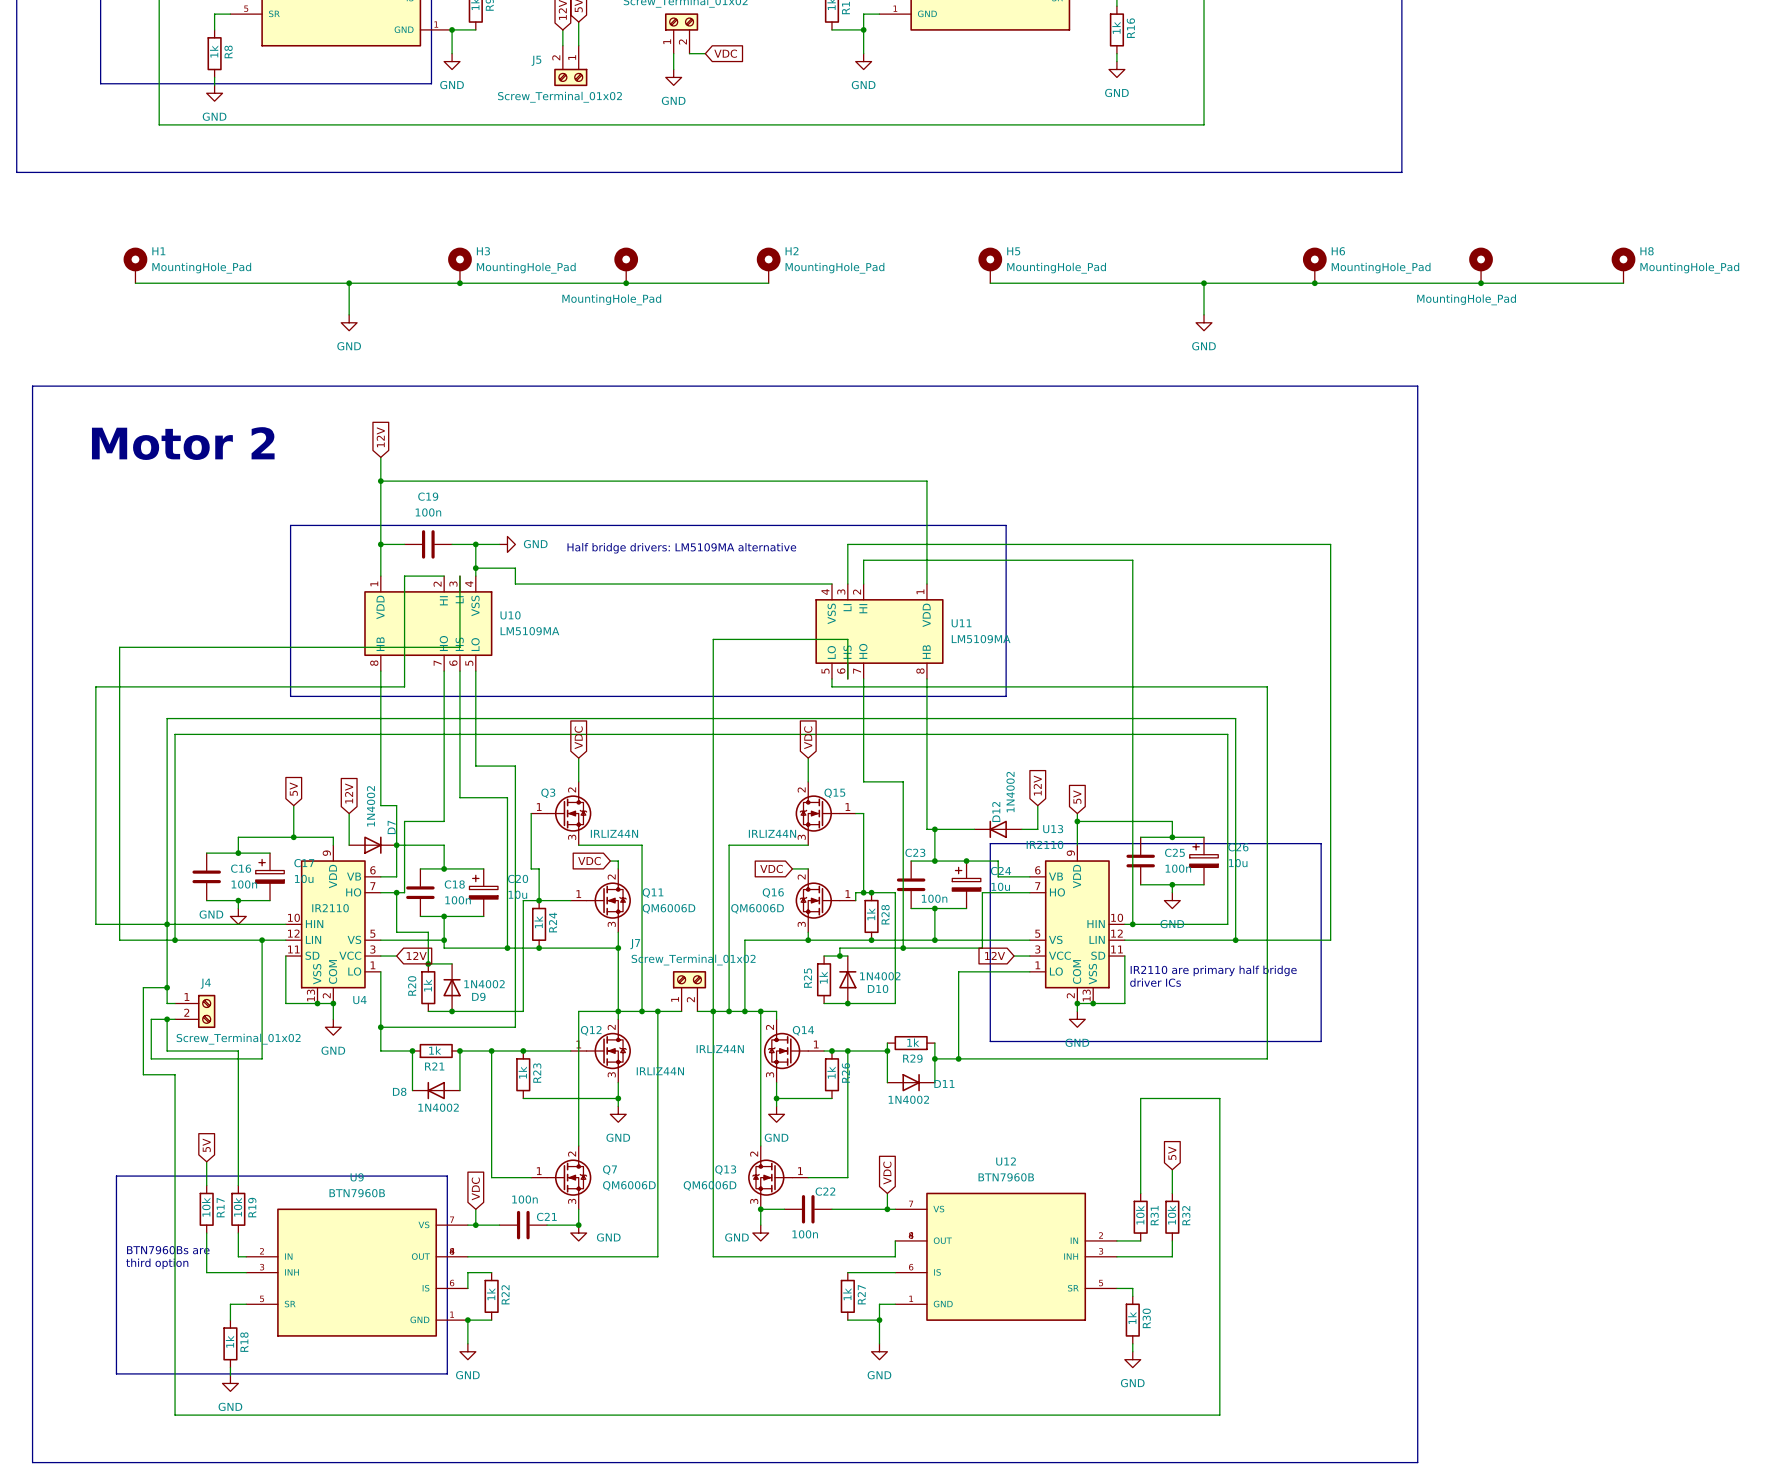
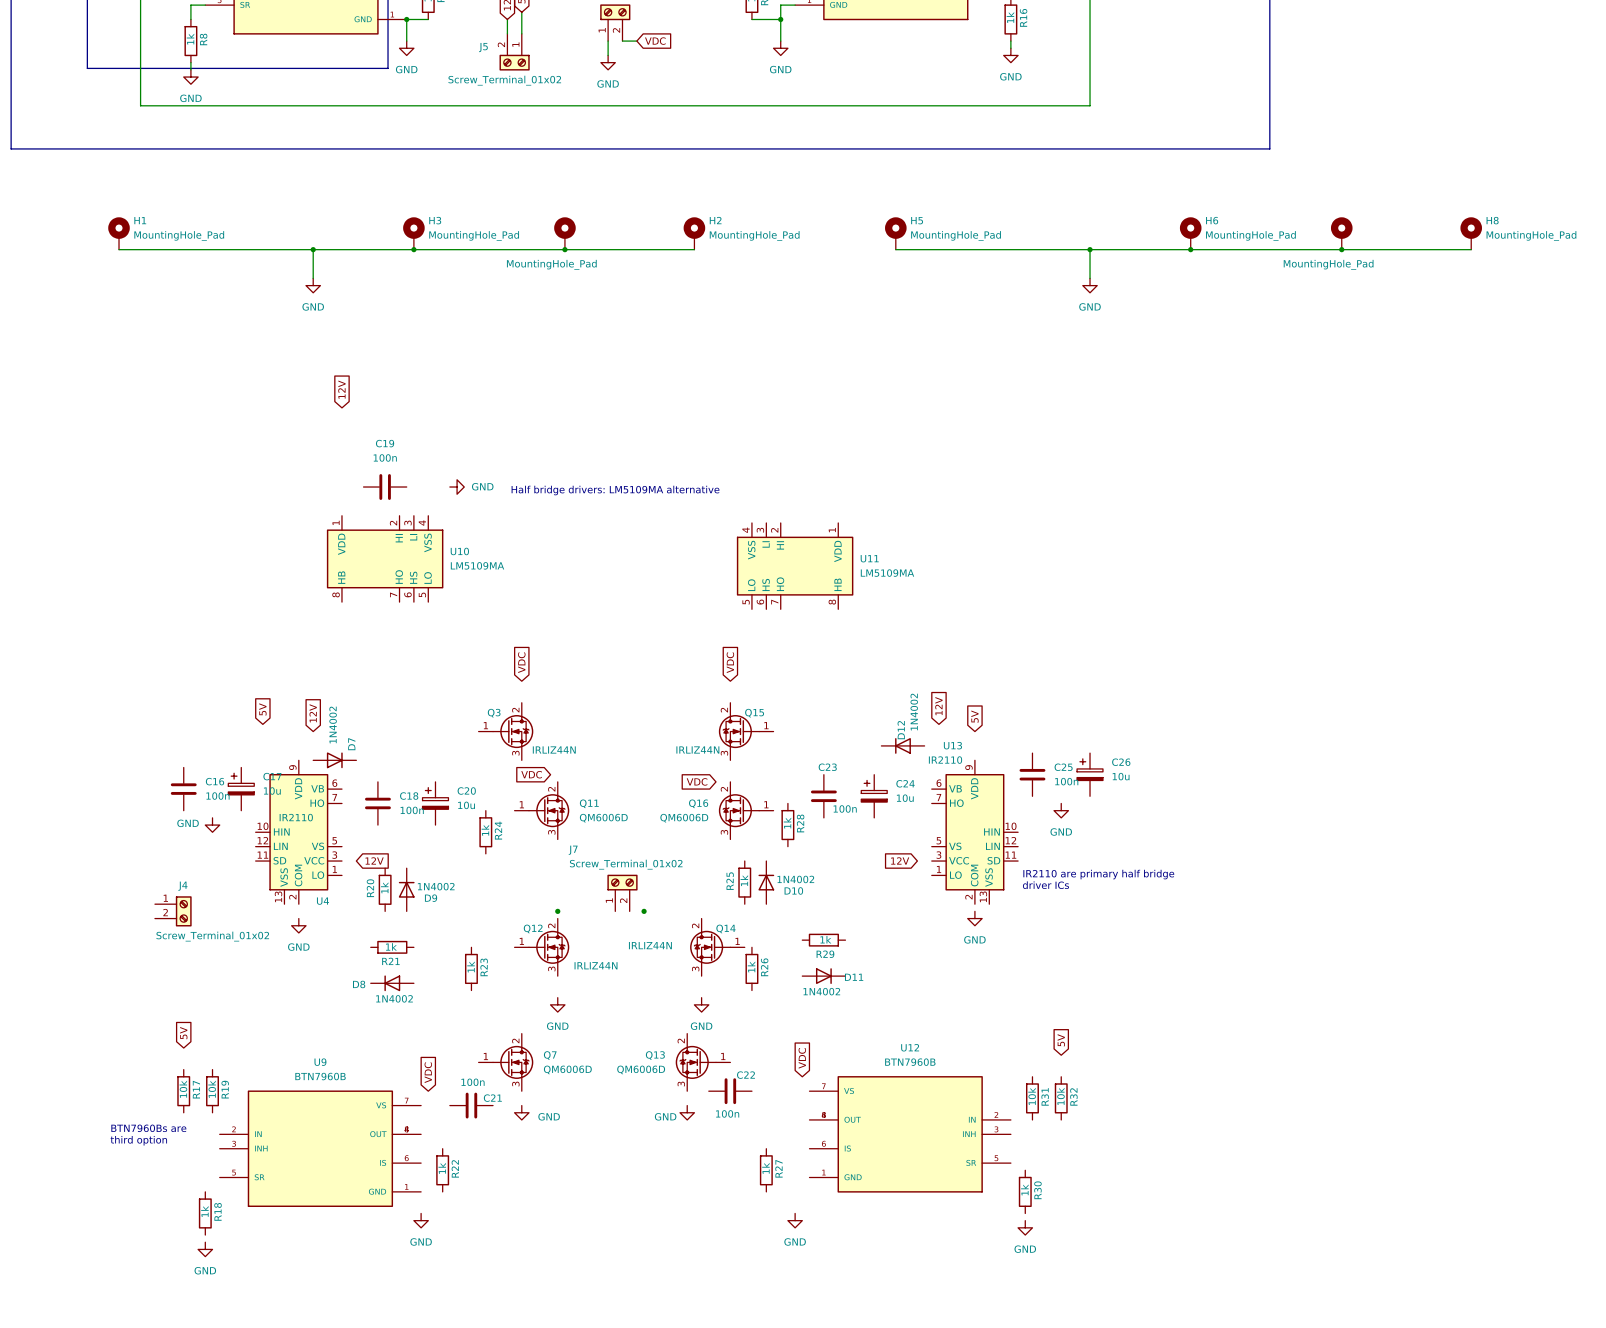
line: (32, 386) (1417, 386) (1417, 1462) (32, 1462) (32, 386) -> none
text: Motor 2 (183, 443) -> none
wire: (380, 457) (380, 576) -> none
wire: (380, 481) (926, 481) (926, 584) -> none
junction: (380, 481) -> none
line: (290, 525) (1006, 525) (1006, 696) (290, 696) (290, 525) -> none
wire: (380, 544) (404, 544) -> none
junction: (380, 544) -> none
wire: (452, 544) (499, 544) -> none
wire: (475, 544) (475, 576) -> none
junction: (475, 544) -> none
wire: (475, 568) (515, 568) (515, 584) (831, 584) -> none
junction: (475, 568) -> none
wire: (444, 576) (404, 576) (404, 686) (95, 686) (95, 924) (285, 924) -> none
wire: (459, 576) (459, 647) (119, 647) (119, 940) (285, 940) -> none
wire: (847, 584) (847, 544) (1330, 544) (1330, 940) (1124, 940) -> none
wire: (863, 584) (863, 560) (1132, 560) (1132, 924) -> none
wire: (380, 671) (380, 805) (396, 805) (396, 876) (380, 876) -> none
wire: (444, 671) (444, 821) (404, 821) (404, 892) (380, 892) -> none
wire: (459, 671) (459, 797) (507, 797) (507, 948) -> none
wire: (475, 671) (475, 766) (515, 766) (515, 1027) (380, 1027) -> none
wire: (831, 678) (831, 686) (1267, 686) (1267, 1058) (934, 1058) -> none
wire: (847, 678) (847, 639) (713, 639) (713, 1256) (895, 1256) (895, 1240) -> none
wire: (863, 678) (863, 781) (903, 781) (903, 948) -> none
wire: (926, 678) (926, 829) (974, 829) -> none
wire: (578, 758) (578, 781) -> none
wire: (808, 758) (808, 781) -> none
wire: (293, 805) (293, 837) -> none
wire: (1037, 805) (1037, 829) (1021, 829) -> none
wire: (349, 813) (349, 845) -> none
wire: (531, 813) (531, 868) (539, 868) (539, 900) -> none
wire: (855, 813) (863, 813) (863, 892) -> none
wire: (1077, 813) (1077, 845) -> none
wire: (1077, 821) (1172, 821) (1172, 837) -> none
junction: (1077, 821) -> none
wire: (934, 829) (934, 861) -> none
junction: (934, 829) -> none
junction: (293, 837) -> none
wire: (1140, 837) (1204, 837) -> none
junction: (1172, 837) -> none
line: (990, 843) (1321, 843) (1321, 1041) (990, 1041) (990, 843) -> none
wire: (333, 845) (333, 837) (238, 837) (238, 853) -> none
wire: (396, 845) (444, 845) (444, 868) -> none
junction: (396, 845) -> none
wire: (578, 845) (642, 845) (642, 1011) -> none
wire: (808, 845) (729, 845) (729, 1011) -> none
wire: (206, 853) (270, 853) -> none
junction: (238, 853) -> none
wire: (610, 861) (618, 861) (618, 868) -> none
wire: (911, 861) (998, 861) (998, 876) (1029, 876) -> none
junction: (934, 861) -> none
junction: (966, 861) -> none
wire: (420, 868) (483, 868) -> none
junction: (444, 868) -> none
wire: (792, 868) (808, 868) -> none
wire: (1140, 884) (1204, 884) -> none
wire: (1172, 884) (1172, 892) -> none
junction: (1172, 884) -> none
wire: (396, 892) (396, 932) (428, 932) (428, 963) (452, 963) -> none
junction: (396, 892) -> none
junction: (863, 892) -> none
junction: (871, 892) -> none
wire: (1029, 892) (982, 892) (982, 948) (839, 948) (839, 956) -> none
wire: (206, 900) (270, 900) -> none
wire: (238, 900) (238, 908) -> none
junction: (238, 900) -> none
junction: (539, 900) -> none
wire: (570, 900) (523, 900) (523, 1011) (428, 1011) -> none
wire: (855, 900) (855, 892) (895, 892) (895, 1003) (824, 1003) -> none
wire: (911, 908) (966, 908) -> none
wire: (934, 908) (934, 940) -> none
junction: (934, 908) -> none
wire: (420, 916) (483, 916) -> none
wire: (444, 916) (444, 948) (618, 948) -> none
junction: (444, 916) -> none
junction: (167, 924) -> none
wire: (1124, 924) (1227, 924) (1227, 734) (175, 734) (175, 940) -> none
junction: (1132, 924) -> none
wire: (618, 932) (618, 1019) -> none
wire: (808, 932) (808, 940) -> none
junction: (175, 940) -> none
wire: (262, 940) (262, 1058) (151, 1058) (151, 1019) (175, 1019) -> none
junction: (262, 940) -> none
wire: (380, 940) (444, 940) -> none
junction: (444, 940) -> none
junction: (808, 940) -> none
junction: (871, 940) -> none
junction: (934, 940) -> none
wire: (1029, 940) (744, 940) (744, 1011) -> none
wire: (1235, 940) (1235, 718) (167, 718) (167, 1003) (175, 1003) -> none
junction: (1235, 940) -> none
junction: (507, 948) -> none
junction: (539, 948) -> none
junction: (618, 948) -> none
junction: (903, 948) -> none
wire: (285, 956) (285, 1003) (333, 1003) (333, 1019) -> none
wire: (380, 956) (396, 956) -> none
wire: (824, 956) (847, 956) -> none
junction: (839, 956) -> none
wire: (1014, 956) (1029, 956) -> none
wire: (1124, 956) (1124, 1003) (1077, 1003) (1077, 1011) -> none
junction: (428, 963) -> none
wire: (380, 971) (380, 1051) (412, 1051) (412, 1090) -> none
wire: (1029, 971) (958, 971) (958, 1058) -> none
wire: (167, 987) (143, 987) (143, 1074) (175, 1074) (175, 1415) (1219, 1415) (1219, 1098) (1140, 1098) (1140, 1193) -> none
junction: (167, 987) -> none
junction: (317, 1003) -> none
junction: (333, 1003) -> none
junction: (847, 1003) -> none
junction: (1077, 1003) -> none
junction: (1093, 1003) -> none
junction: (452, 1011) -> none
junction: (642, 1011) -> none
wire: (657, 1011) (657, 1256) (467, 1256) -> none
junction: (657, 1011) -> none
wire: (681, 1011) (578, 1011) (578, 1145) -> none
wire: (697, 1011) (776, 1011) (776, 1019) -> none
junction: (729, 1011) -> none
junction: (744, 1011) -> none
wire: (760, 1011) (760, 1145) -> none
junction: (760, 1011) -> none
wire: (167, 1019) (167, 1051) (238, 1051) (238, 1185) -> none
junction: (167, 1019) -> none
junction: (380, 1027) -> none
wire: (887, 1043) (887, 1082) -> none
wire: (934, 1043) (934, 1082) -> none
junction: (412, 1051) -> none
junction: (459, 1051) -> none
wire: (491, 1051) (491, 1177) (531, 1177) -> none
junction: (491, 1051) -> none
junction: (523, 1051) -> none
wire: (570, 1051) (459, 1051) (459, 1090) -> none
wire: (824, 1051) (887, 1051) -> none
junction: (831, 1051) -> none
wire: (847, 1051) (847, 1177) (808, 1177) -> none
junction: (847, 1051) -> none
junction: (887, 1051) -> none
junction: (934, 1058) -> none
junction: (958, 1058) -> none
wire: (618, 1082) (618, 1106) -> none
wire: (776, 1082) (776, 1106) -> none
wire: (523, 1098) (618, 1098) -> none
junction: (618, 1098) -> none
wire: (776, 1098) (831, 1098) -> none
junction: (776, 1098) -> none
wire: (206, 1161) (206, 1185) -> none
wire: (1172, 1169) (1172, 1193) -> none
line: (116, 1176) (447, 1176) (447, 1373) (116, 1373) (116, 1176) -> none
wire: (887, 1193) (887, 1209) -> none
wire: (475, 1209) (475, 1225) -> none
wire: (578, 1209) (578, 1225) (547, 1225) -> none
junction: (760, 1209) -> none
wire: (784, 1209) (760, 1209) (760, 1225) -> none
wire: (831, 1209) (895, 1209) -> none
junction: (887, 1209) -> none
wire: (467, 1225) (499, 1225) -> none
junction: (475, 1225) -> none
junction: (578, 1225) -> none
wire: (206, 1233) (206, 1272) (246, 1272) -> none
wire: (238, 1233) (238, 1256) (246, 1256) -> none
wire: (1116, 1240) (1140, 1240) -> none
wire: (1172, 1240) (1172, 1256) (1116, 1256) -> none
wire: (491, 1272) (467, 1272) (467, 1288) -> none
wire: (847, 1272) (895, 1272) -> none
wire: (1116, 1288) (1132, 1288) (1132, 1296) -> none
wire: (246, 1304) (230, 1304) (230, 1320) -> none
wire: (895, 1304) (879, 1304) (879, 1343) -> none
junction: (467, 1320) -> none
wire: (491, 1320) (467, 1320) (467, 1343) -> none
wire: (847, 1320) (879, 1320) -> none
junction: (879, 1320) -> none
wire: (1132, 1343) (1132, 1351) -> none
wire: (230, 1367) (230, 1375) -> none

